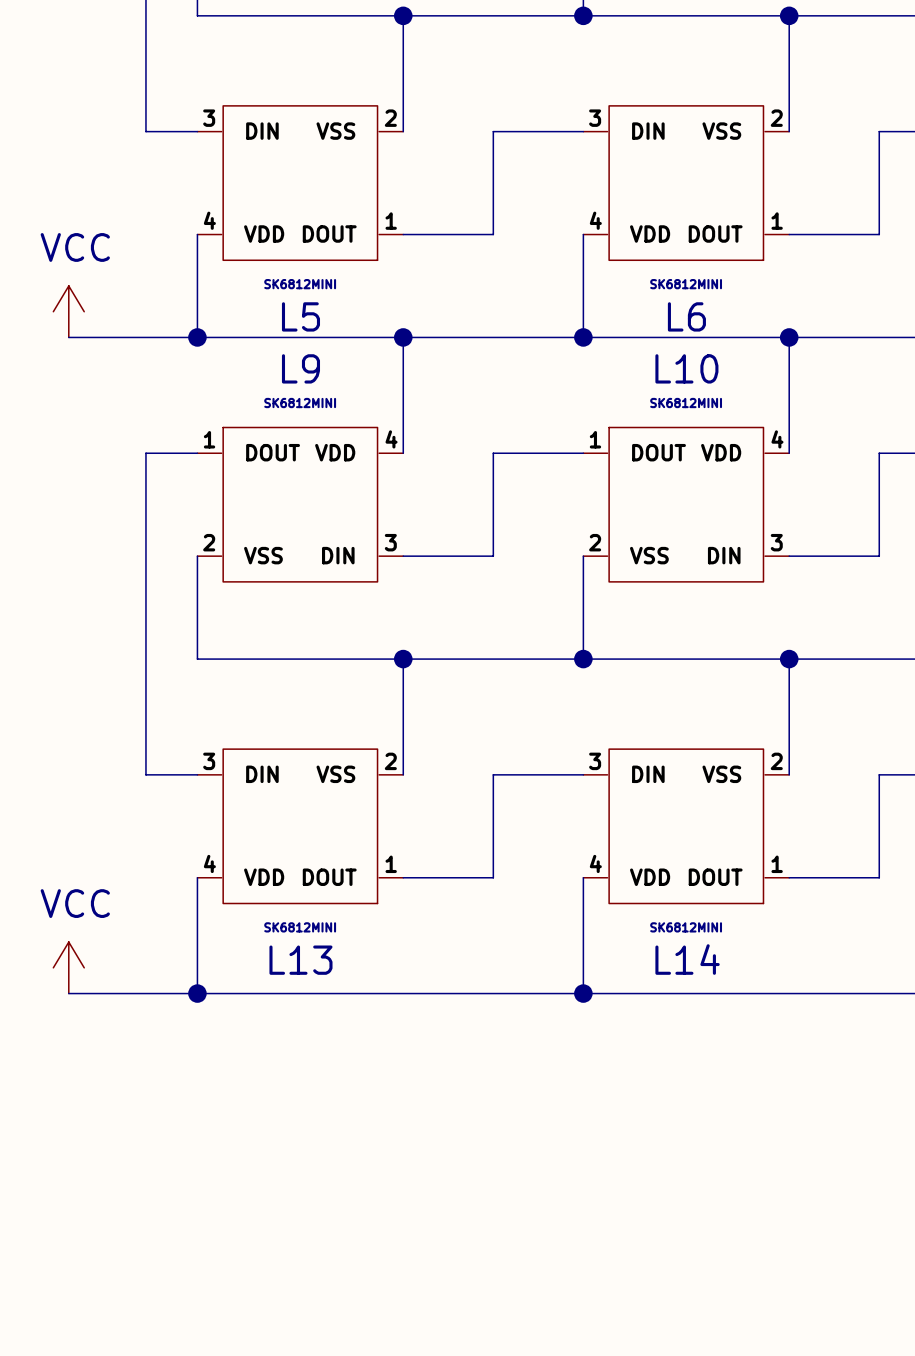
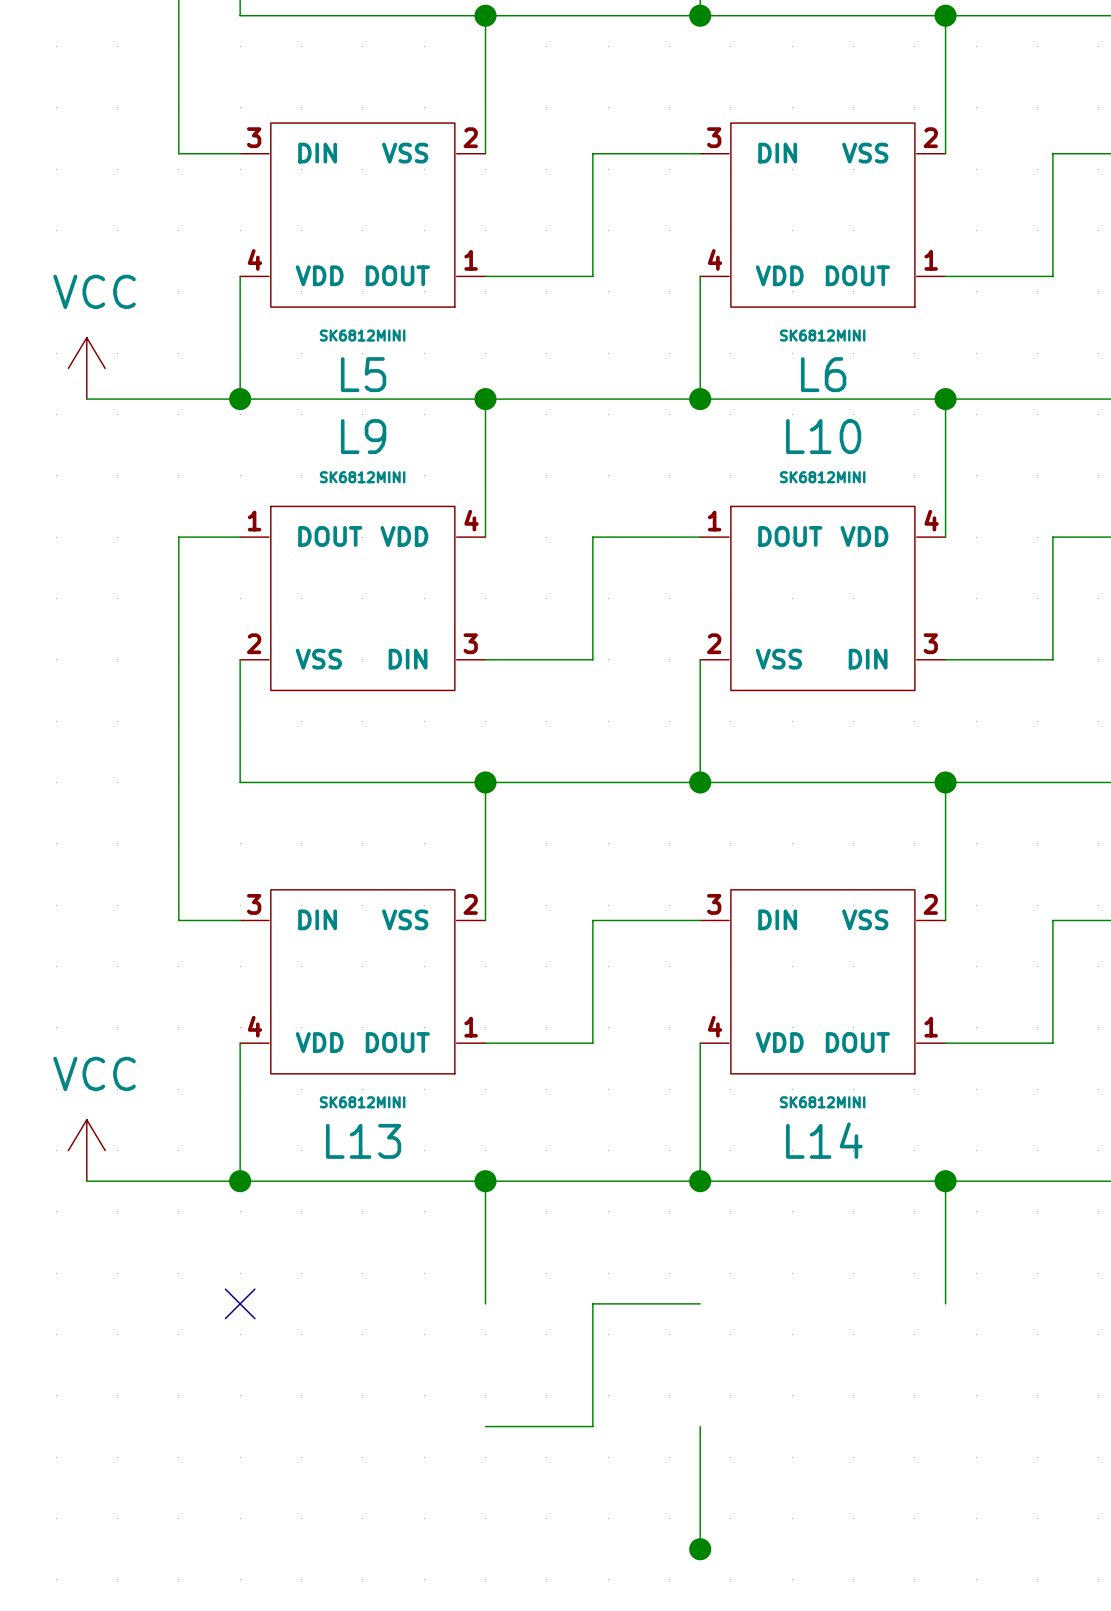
wire: none -> (485, 1181) (485, 1303)
junction: none -> (485, 1181)
wire: none -> (945, 1181) (945, 1303)
junction: none -> (945, 1181)
no-connect mark: none -> (240, 1303)
wire: none -> (700, 1303) (592, 1303) (592, 1426) (485, 1426)
wire: none -> (700, 1426) (700, 1549)
junction: none -> (700, 1549)

